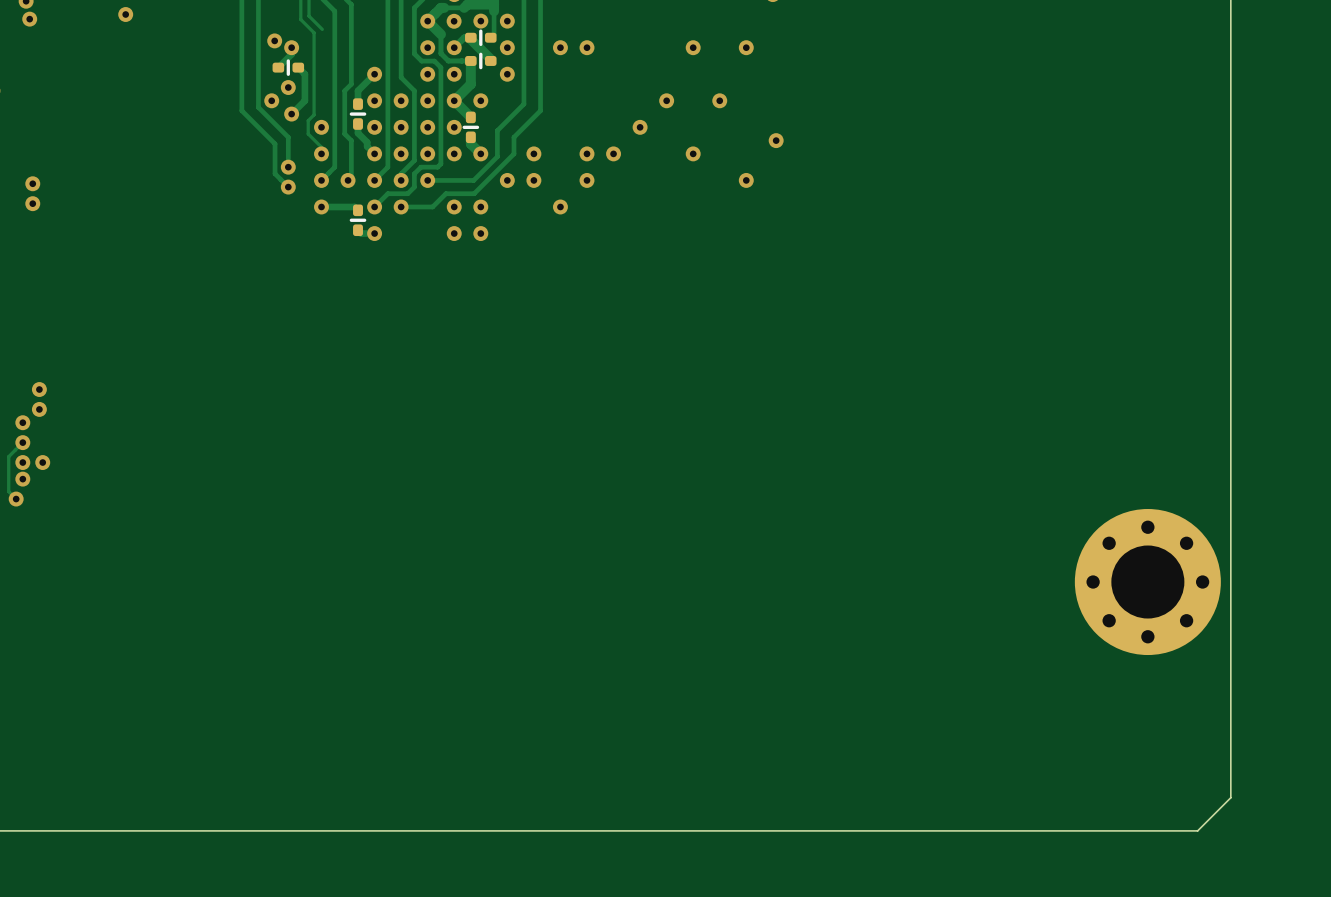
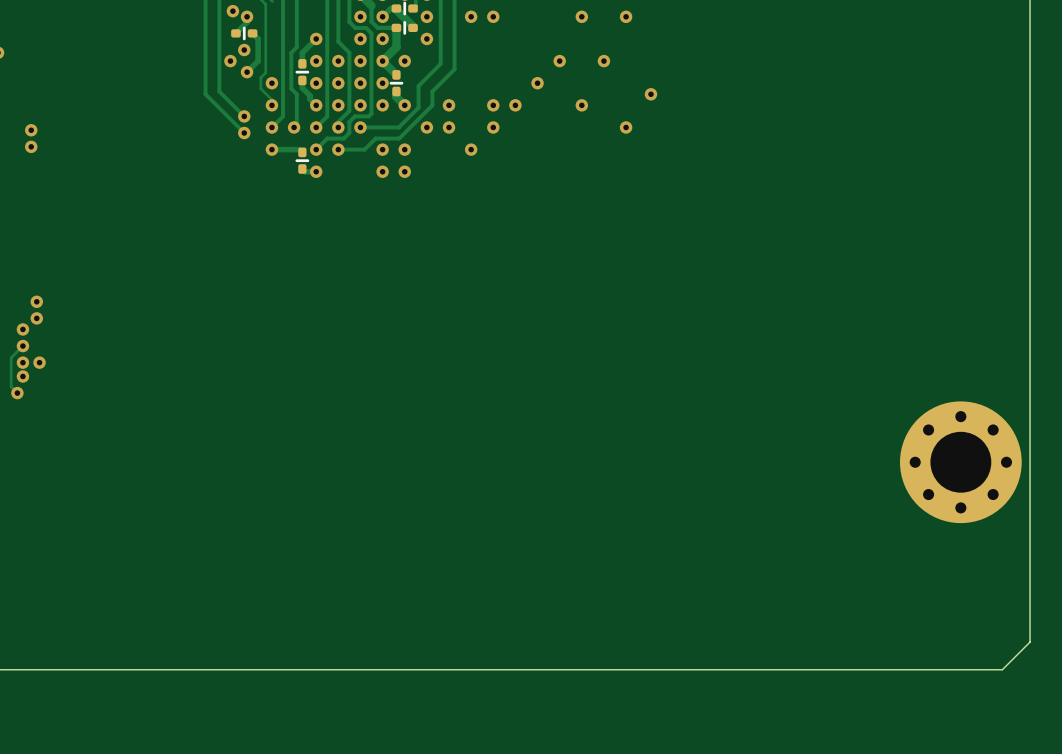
track: (258, 107) (288, 137) (288, 167) -> (219, 66) (219, 91) (244, 116)
track: (241, 110) (275, 143) (275, 173) -> (205, 69) (205, 94) (233, 121)

